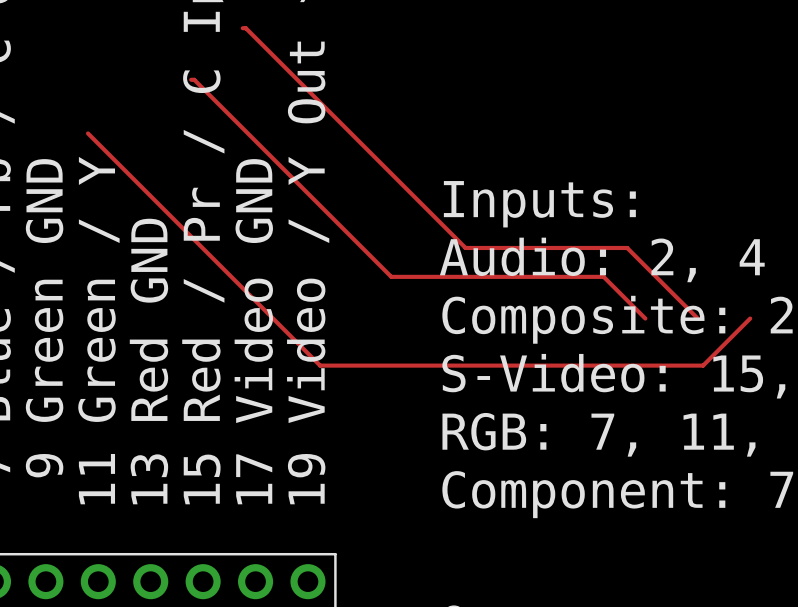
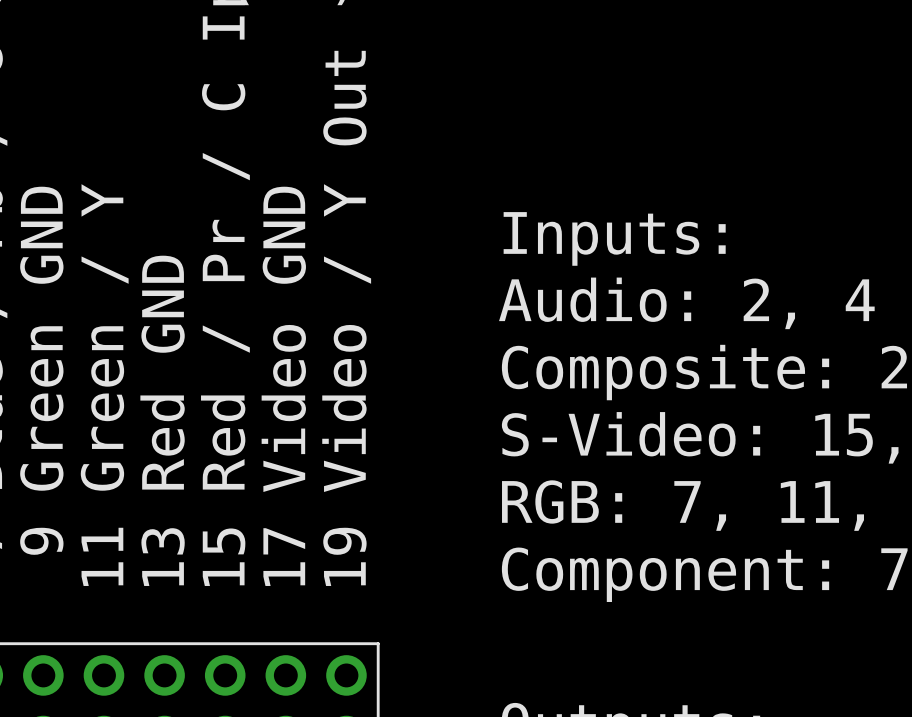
track: (242, 28) (245, 28) (465, 247) (627, 247) (697, 318) -> none
track: (191, 79) (194, 79) (391, 276) (603, 276) (645, 318) -> none
track: (87, 133) (320, 365) (703, 365) (750, 318) -> none

